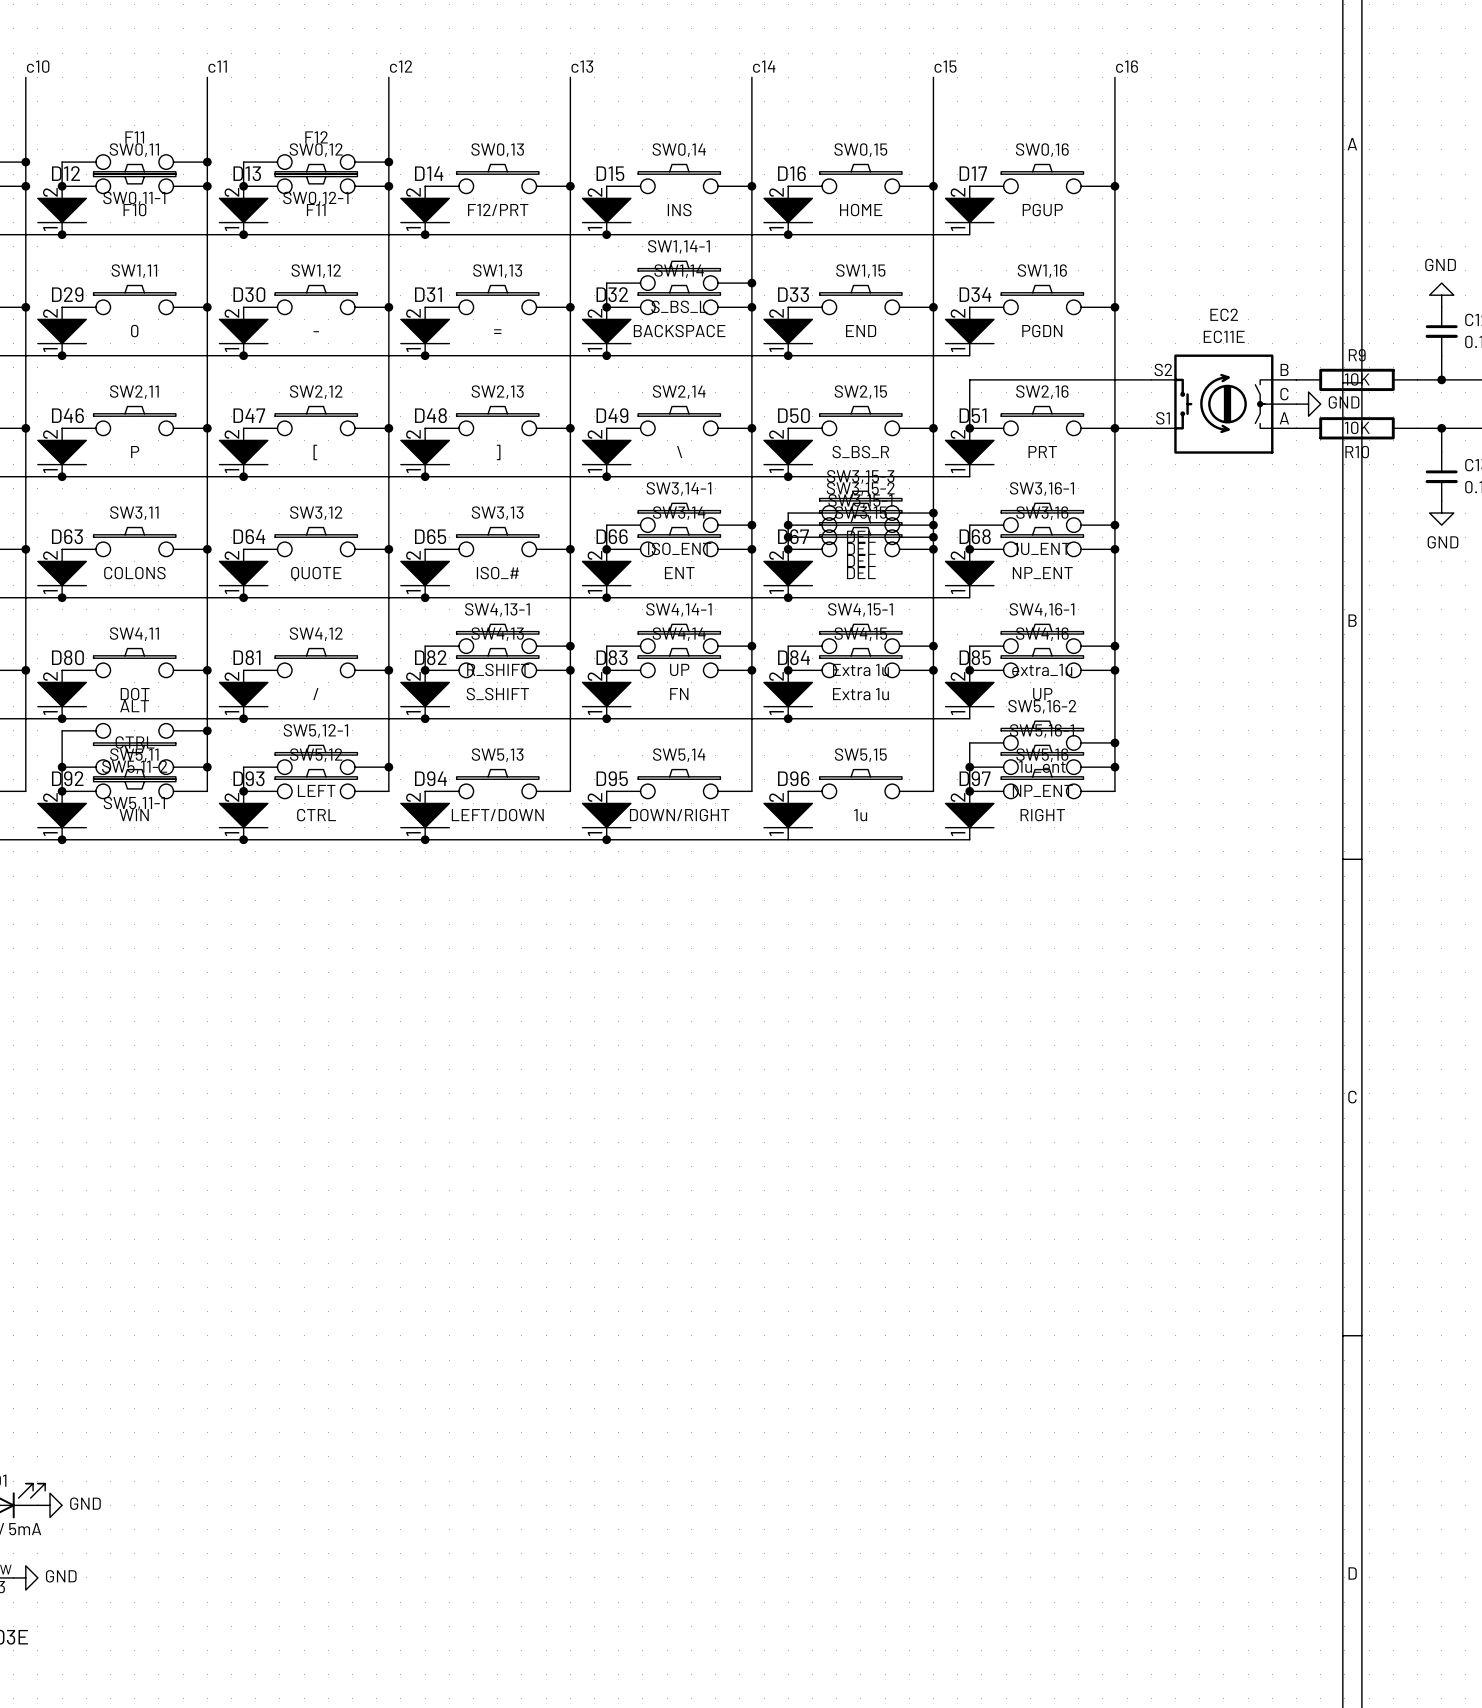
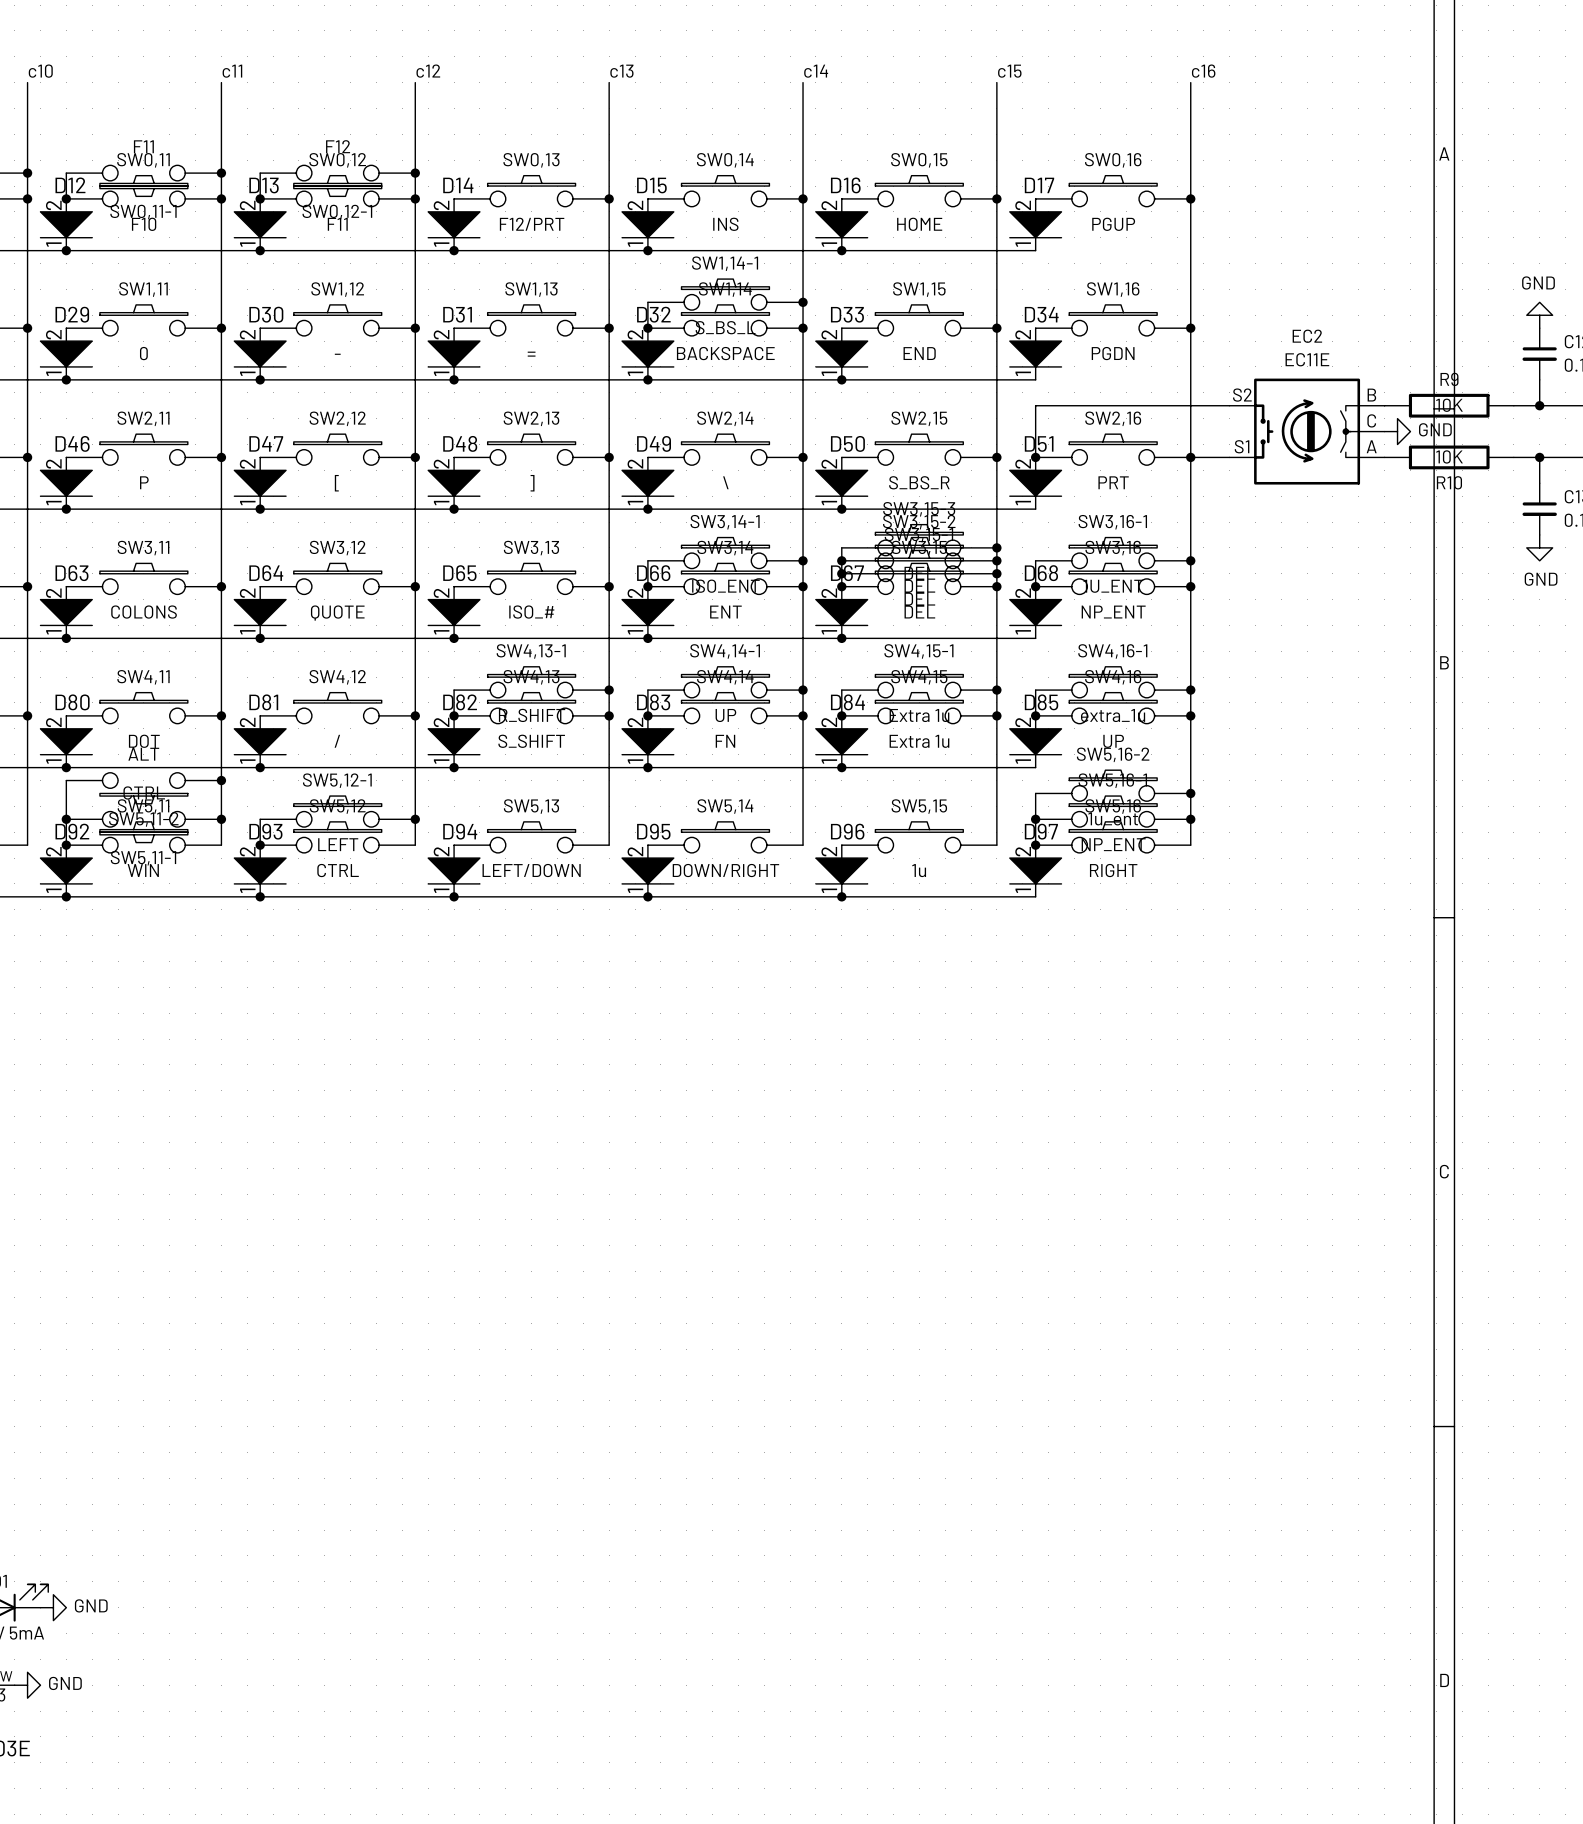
junction: none -> (841, 896)

